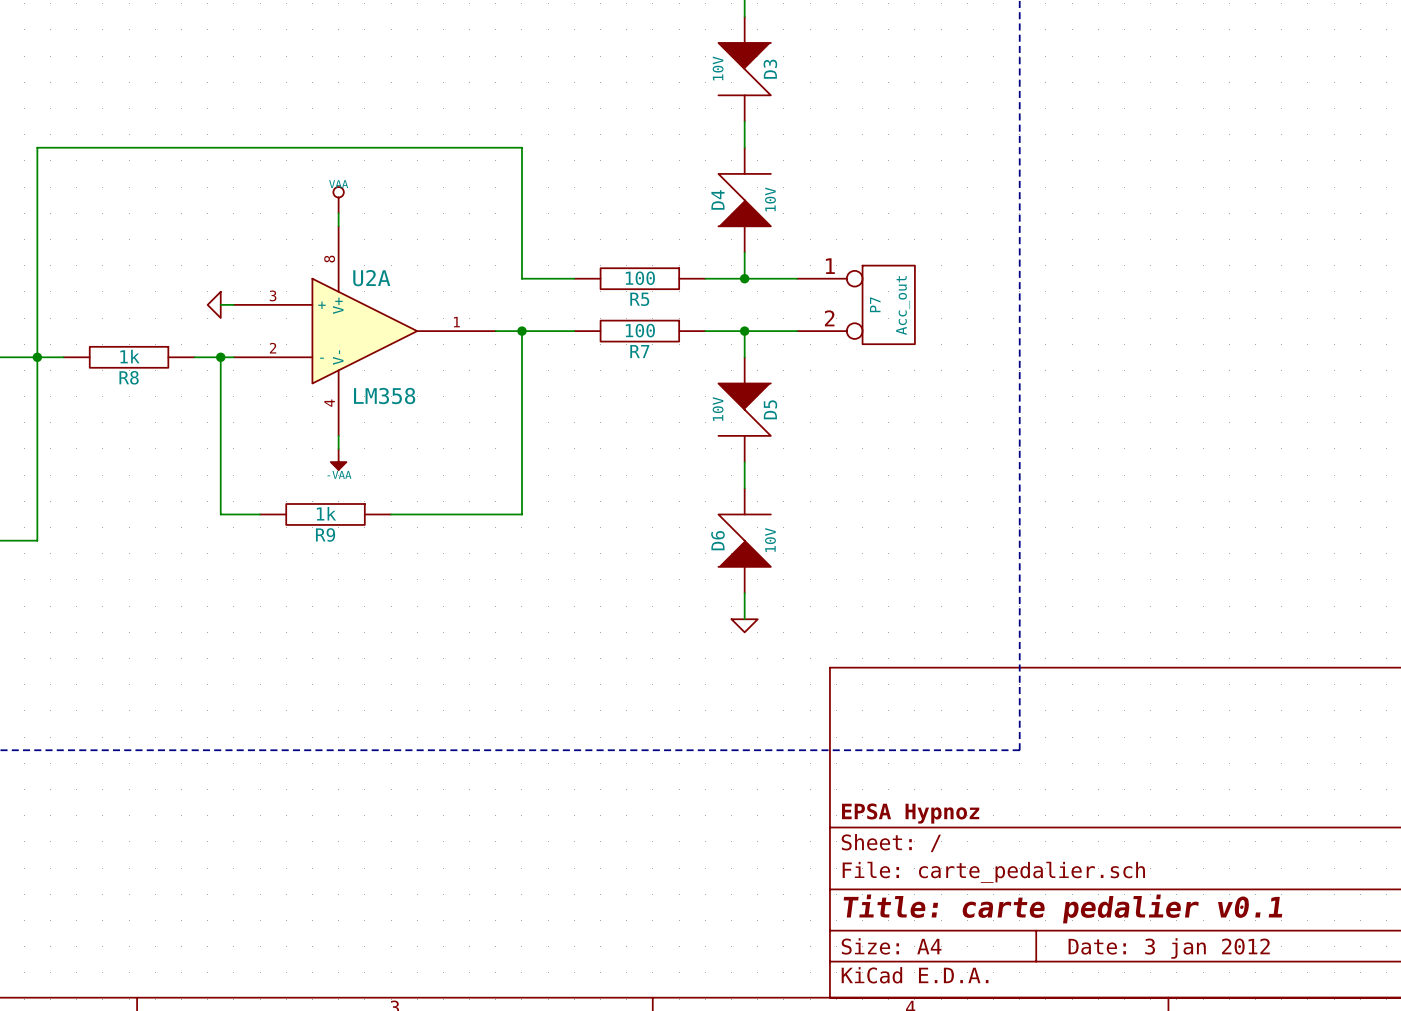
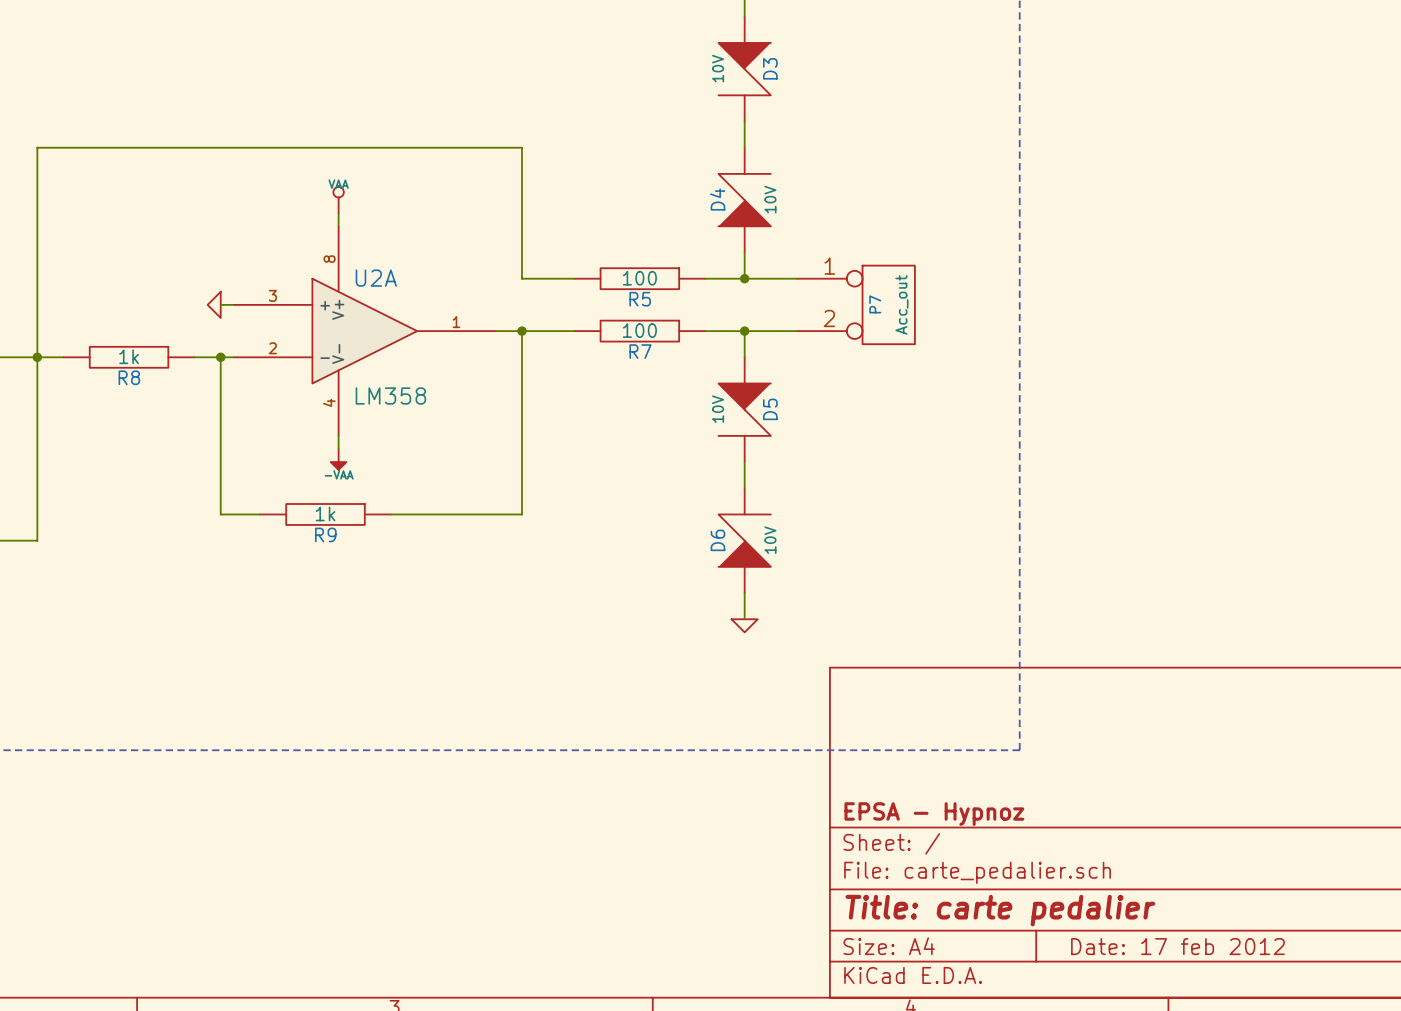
title block: EPSA Hypnoz (910, 813) -> EPSA - Hypnoz (934, 814)
title block: Title: carte pedalier v0.1 (1062, 908) -> Title: carte pedalier (1000, 910)
title block: Date: 3 jan 2012 (1169, 948) -> Date: 17 feb 2012 (1177, 946)

